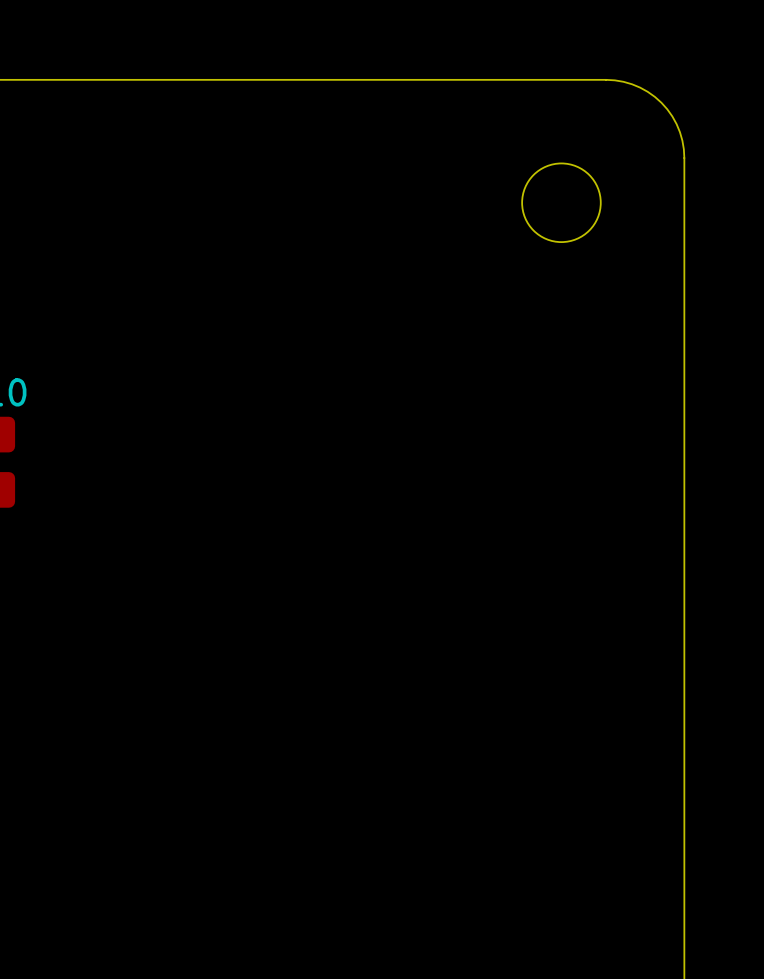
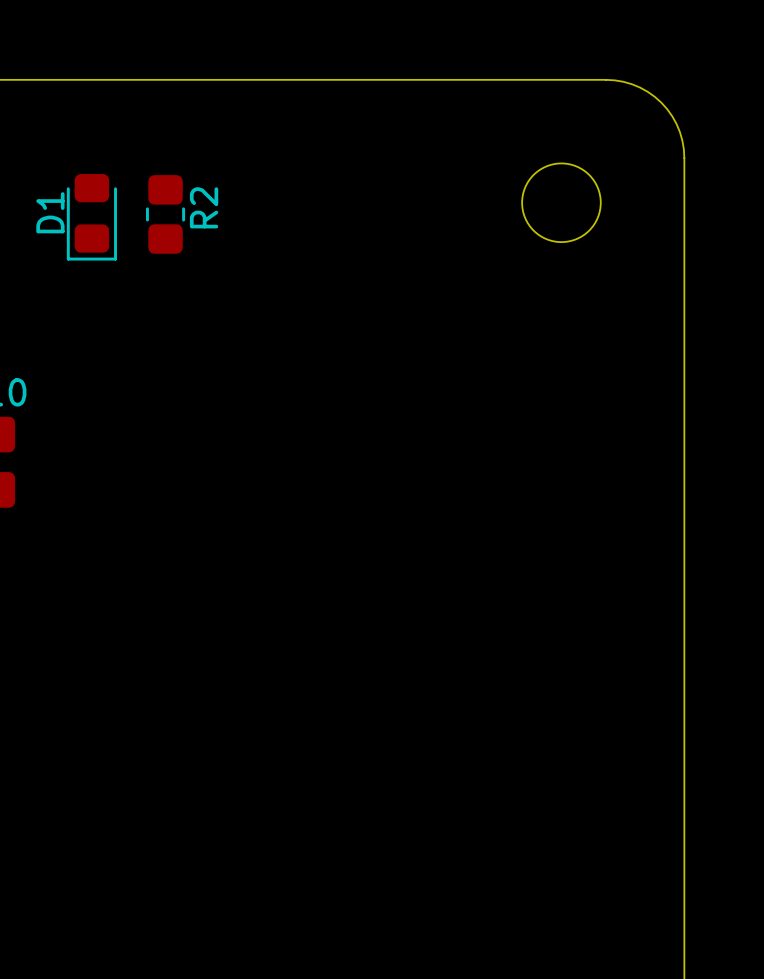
R2: none -> (165, 214)
D1: none -> (91, 217)

